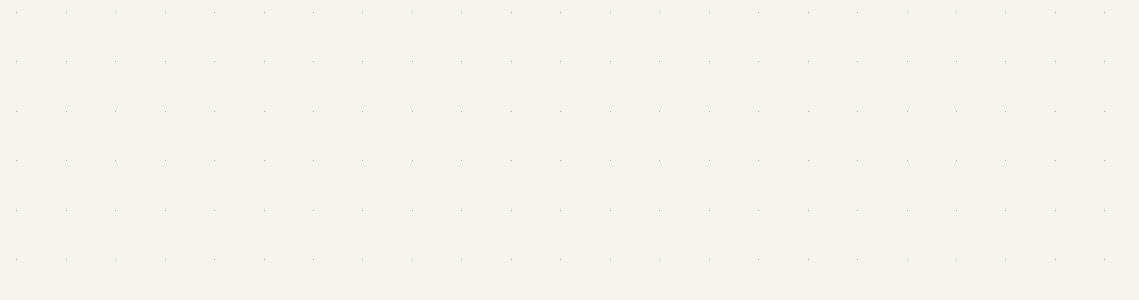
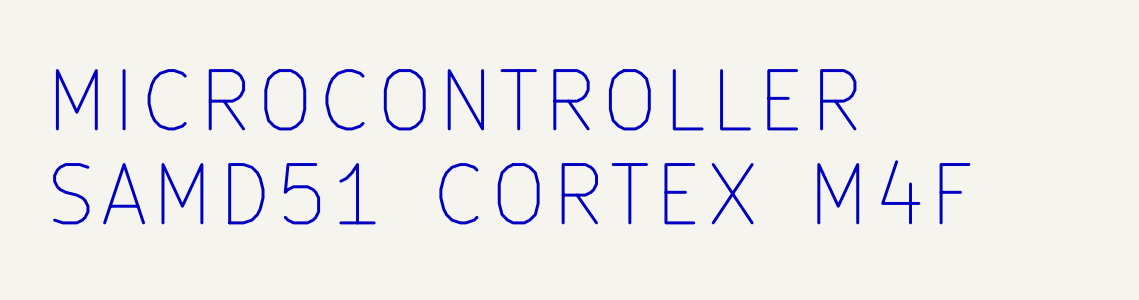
text: none -> MICROCONTROLLER (456, 99)
text: none -> SAMD51 CORTEX M4F (511, 192)

